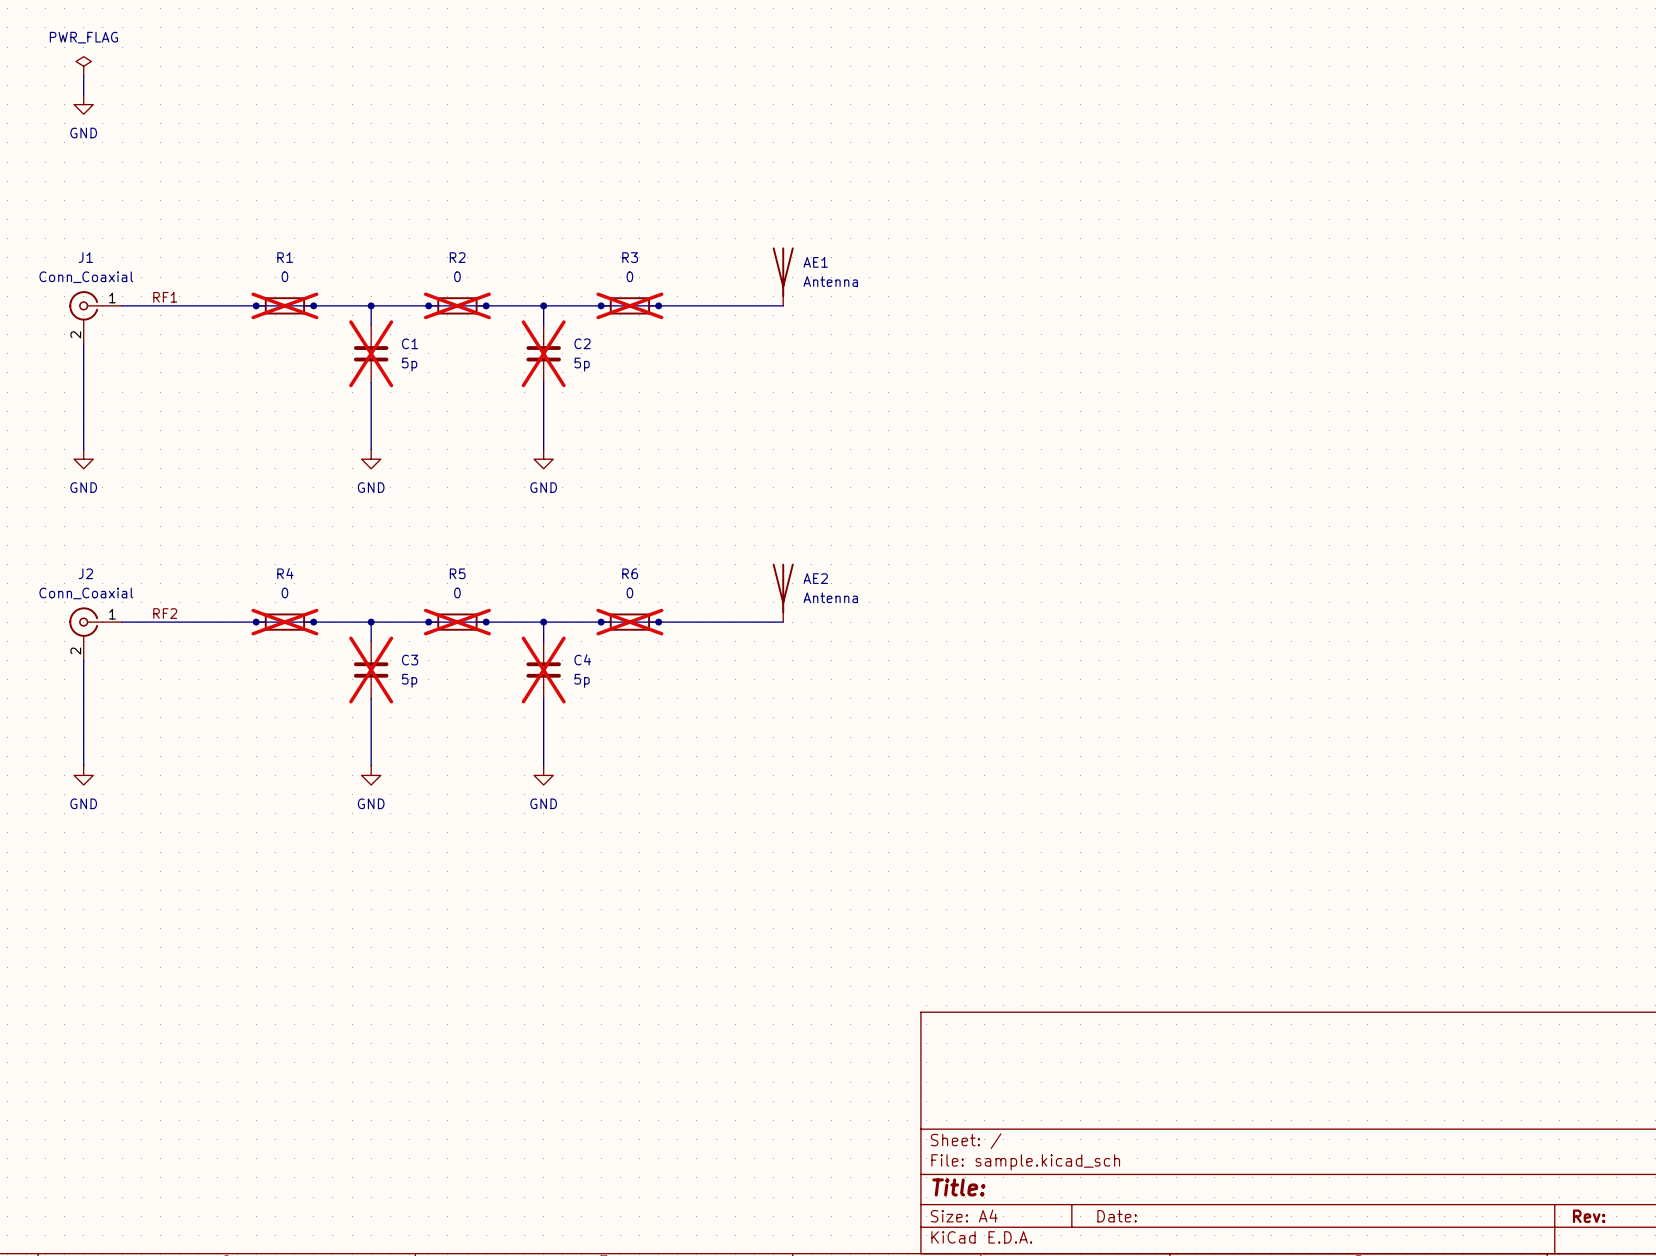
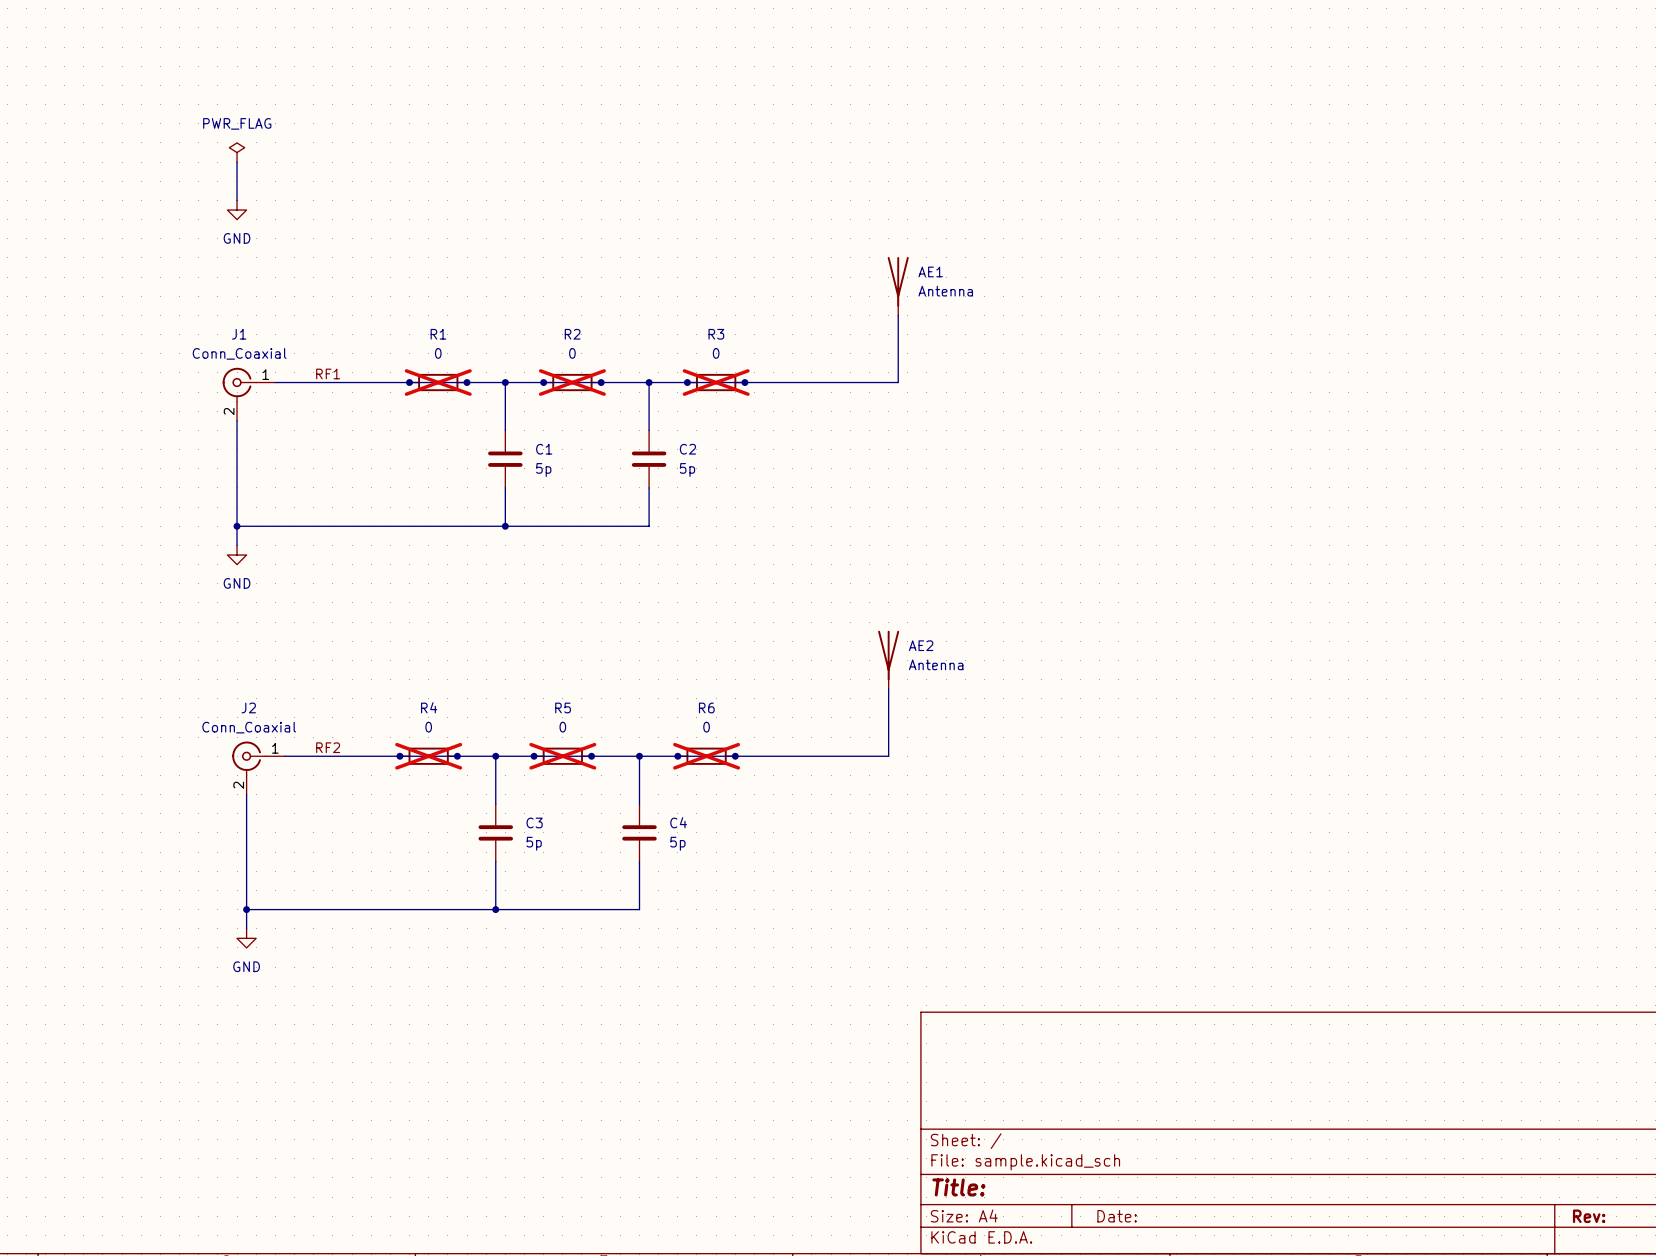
power symbol position: PWR_FLAG (83, 66) -> PWR_FLAG (237, 152)
wire: (83, 75) (83, 95) -> none
power symbol: GND (83, 104) -> none
wire: none -> (237, 162) (237, 200)
power symbol: none -> GND (237, 210)
AE1 position: (783, 276) -> (898, 286)
label position: RF1 (165, 297) -> RF1 (328, 373)
wire: (122, 305) (783, 305) -> none
junction: (256, 305) -> none
R1 position: (284, 305) -> (438, 382)
junction: (313, 305) -> none
wire: (371, 305) (371, 325) -> none
junction: (371, 305) -> none
junction: (428, 305) -> none
R2 position: (457, 305) -> (572, 382)
junction: (486, 305) -> none
wire: (543, 305) (543, 325) -> none
junction: (543, 305) -> none
junction: (601, 305) -> none
R3 position: (629, 305) -> (716, 382)
junction: (658, 305) -> none
wire: none -> (898, 315) (898, 382) (275, 382)
J1 position: (95, 317) -> (248, 394)
wire: (83, 344) (83, 449) -> none
C1 position: (371, 353) -> (505, 459)
C1 do-not-place cross: (371, 353) -> none
C2 position: (543, 353) -> (649, 459)
C2 do-not-place cross: (543, 353) -> none
wire: (371, 382) (371, 449) -> none
junction: none -> (409, 382)
junction: none -> (467, 382)
wire: none -> (505, 382) (505, 430)
junction: none -> (505, 382)
wire: (543, 382) (543, 449) -> none
junction: none -> (543, 382)
junction: none -> (601, 382)
wire: none -> (649, 382) (649, 430)
junction: none -> (649, 382)
junction: none -> (687, 382)
junction: none -> (744, 382)
wire: none -> (237, 420) (237, 545)
power symbol: GND (83, 459) -> none
power symbol: GND (371, 459) -> none
power symbol: GND (543, 459) -> none
wire: none -> (505, 487) (505, 526)
wire: none -> (649, 487) (649, 526) (237, 526)
junction: none -> (237, 526)
junction: none -> (505, 526)
power symbol: none -> GND (237, 555)
AE2 position: (783, 592) -> (888, 659)
label: RF2 (165, 613) -> none
wire: (122, 622) (783, 622) -> none
junction: (256, 622) -> none
R4 position: (284, 622) -> (428, 756)
junction: (313, 622) -> none
wire: (371, 622) (371, 641) -> none
junction: (371, 622) -> none
junction: (428, 622) -> none
R5 position: (457, 622) -> (562, 756)
junction: (486, 622) -> none
wire: (543, 622) (543, 641) -> none
junction: (543, 622) -> none
junction: (601, 622) -> none
R6 position: (629, 622) -> (706, 756)
junction: (658, 622) -> none
J2 position: (95, 633) -> (258, 768)
wire: (83, 660) (83, 765) -> none
C3 position: (371, 670) -> (495, 832)
C3 do-not-place cross: (371, 670) -> none
C4 position: (543, 670) -> (639, 832)
C4 do-not-place cross: (543, 670) -> none
wire: none -> (888, 689) (888, 756) (284, 756)
wire: (371, 698) (371, 765) -> none
wire: (543, 698) (543, 765) -> none
label: none -> RF2 (328, 747)
junction: none -> (399, 756)
junction: none -> (457, 756)
wire: none -> (495, 756) (495, 804)
junction: none -> (495, 756)
junction: none -> (534, 756)
junction: none -> (591, 756)
wire: none -> (639, 756) (639, 804)
junction: none -> (639, 756)
junction: none -> (677, 756)
junction: none -> (735, 756)
power symbol: GND (83, 775) -> none
power symbol: GND (371, 775) -> none
power symbol: GND (543, 775) -> none
wire: none -> (246, 794) (246, 928)
wire: none -> (495, 861) (495, 909)
wire: none -> (639, 861) (639, 909) (246, 909)
junction: none -> (246, 909)
junction: none -> (495, 909)
power symbol: none -> GND (246, 938)

